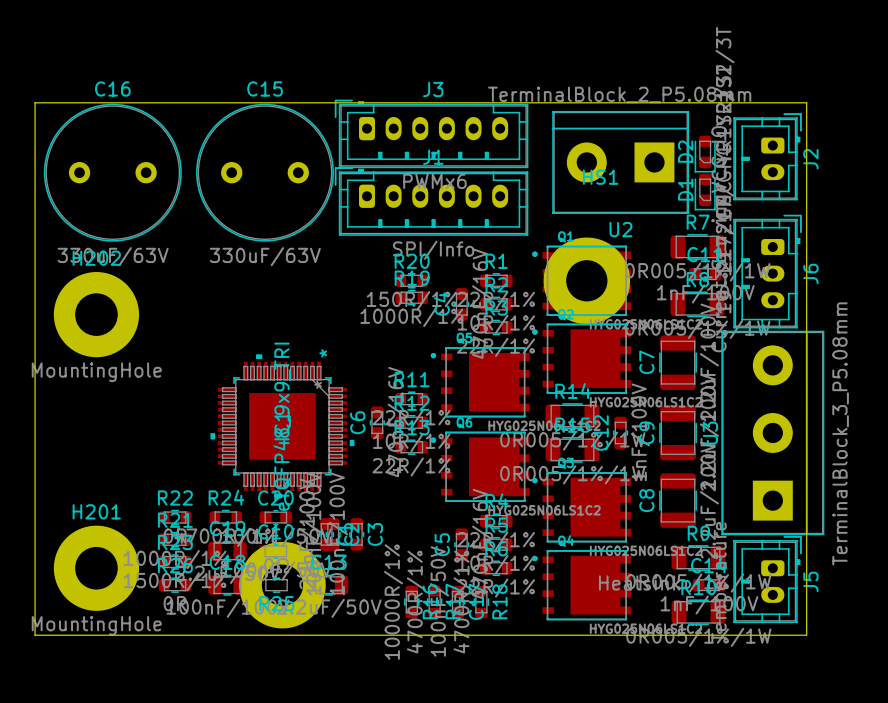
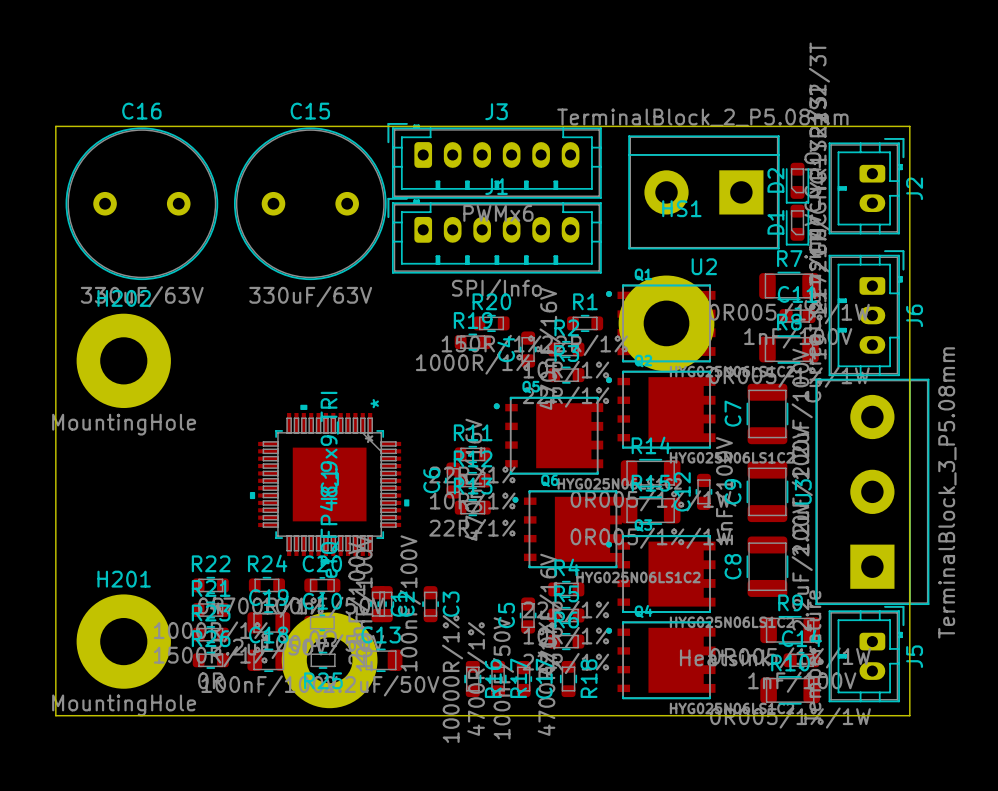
R20 position: (411, 280) -> (491, 323)
R1 position: (496, 280) -> (585, 323)
C6 position: (377, 422) -> (453, 480)
Q6 position: (480, 466) -> (567, 529)
C3 position: (356, 534) -> (430, 604)
R18 position: (481, 602) -> (568, 679)

